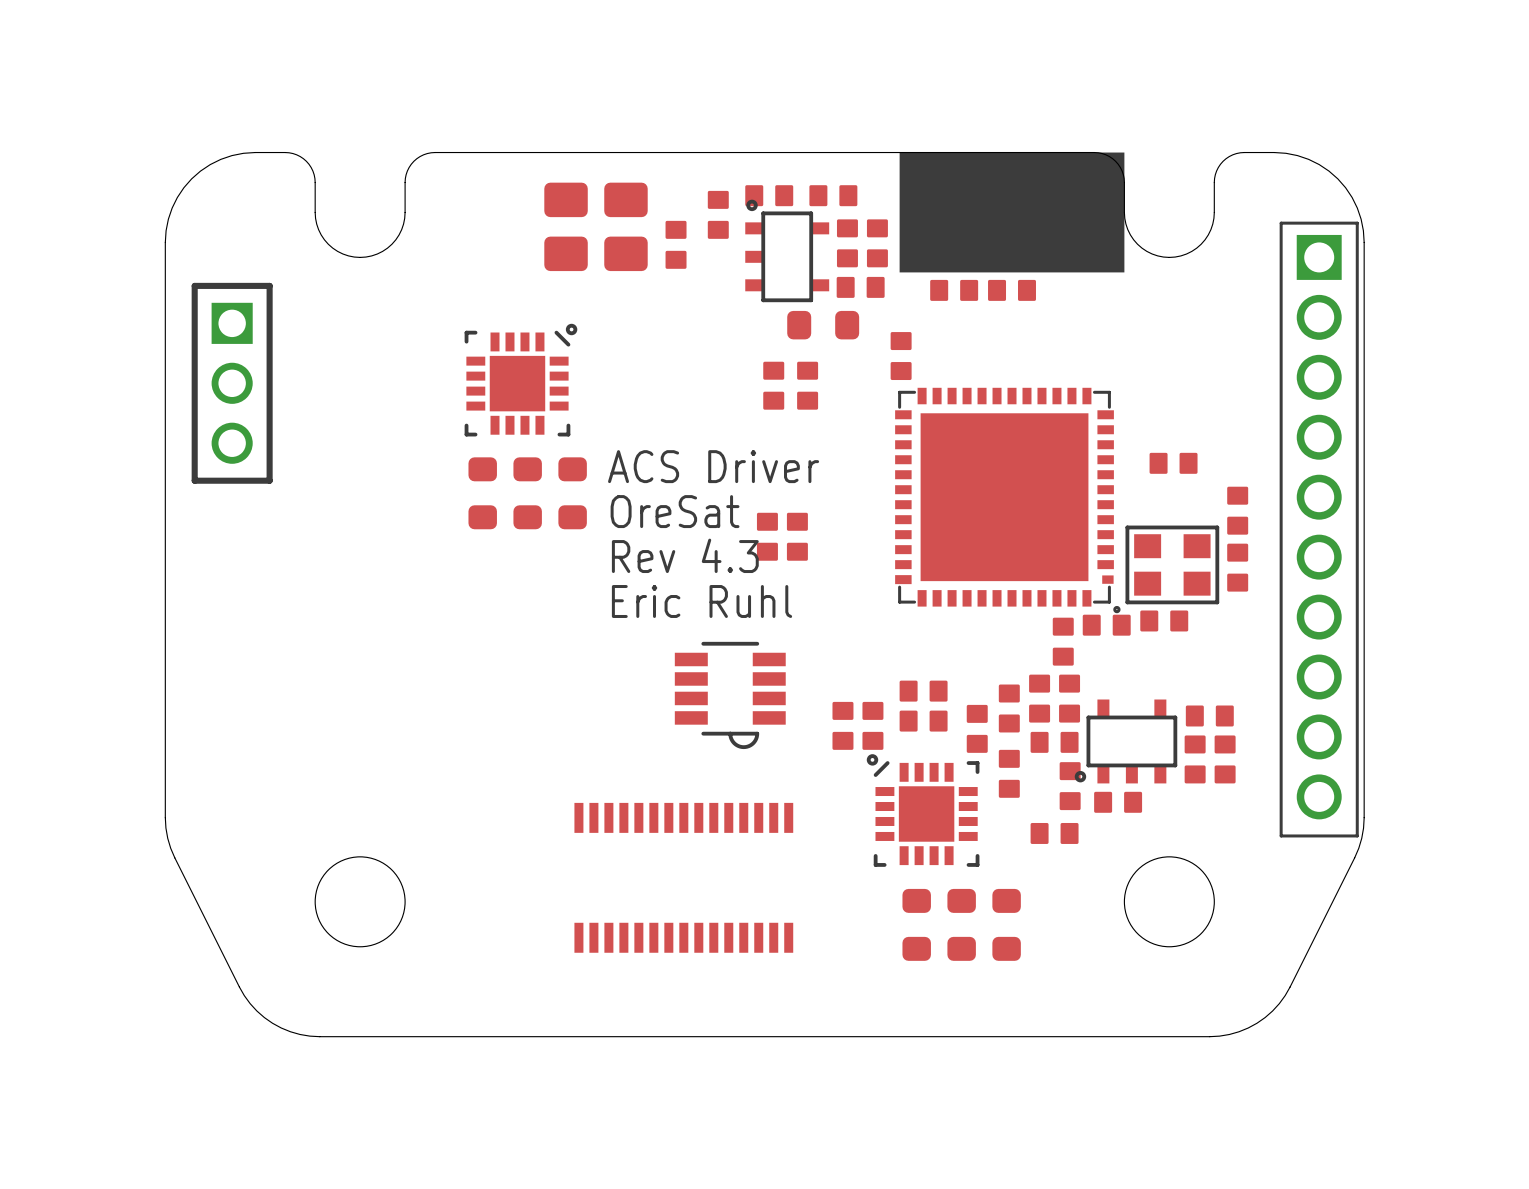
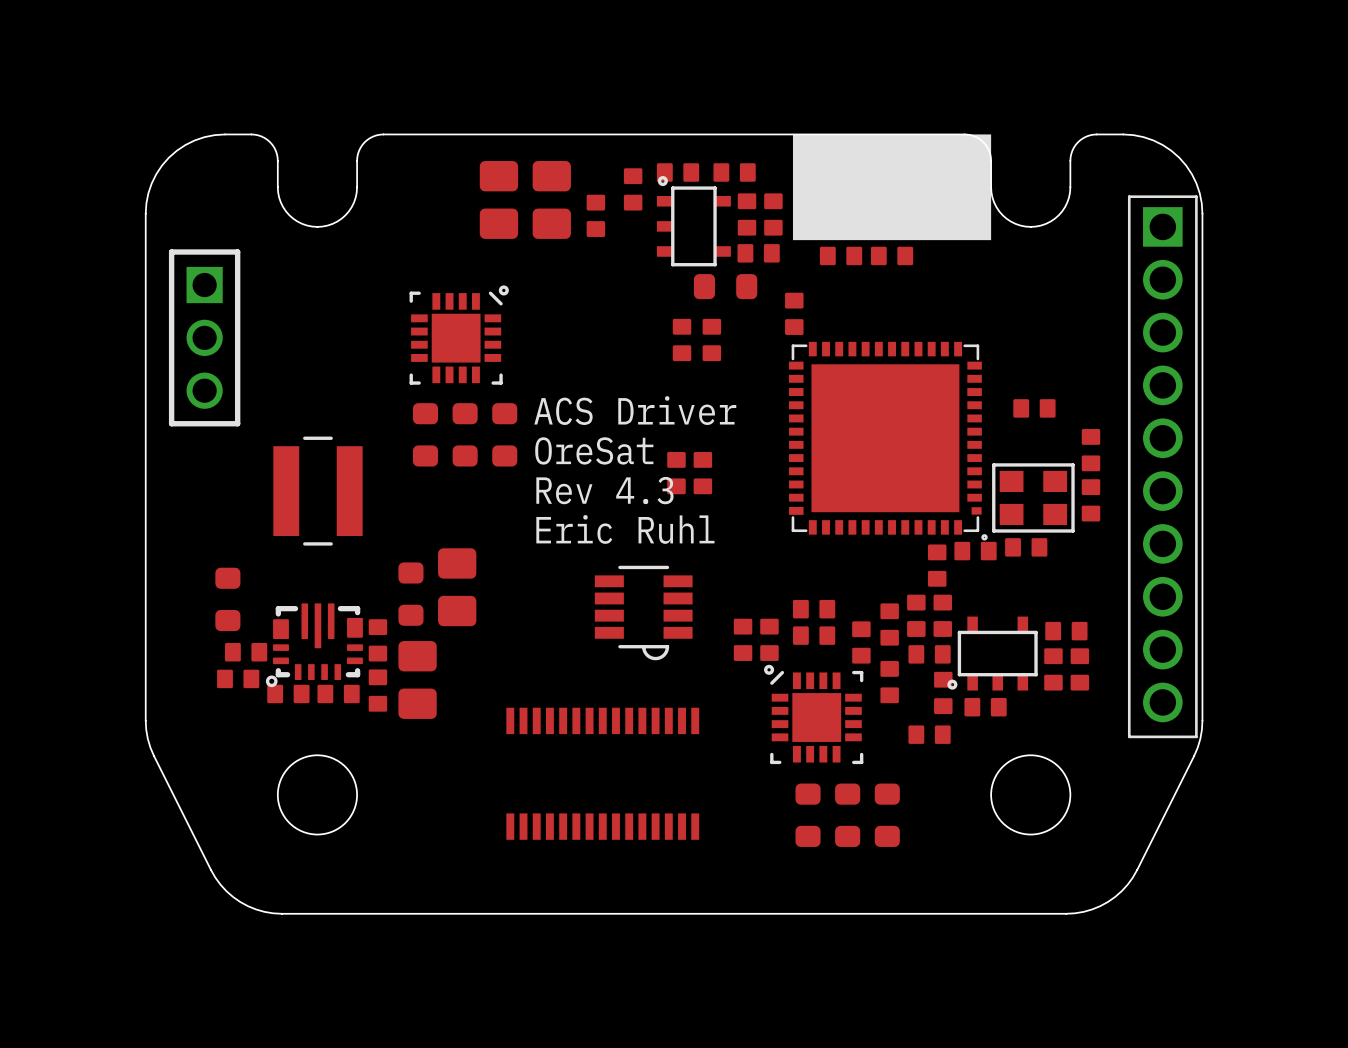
part: none -> (317, 491)
part: none -> (457, 587)
part: none -> (410, 594)
part: none -> (227, 599)
part: none -> (377, 640)
part: none -> (314, 645)
part: none -> (246, 652)
part: none -> (238, 678)
part: none -> (417, 679)
part: none -> (377, 690)
part: none -> (288, 693)
part: none -> (338, 693)

